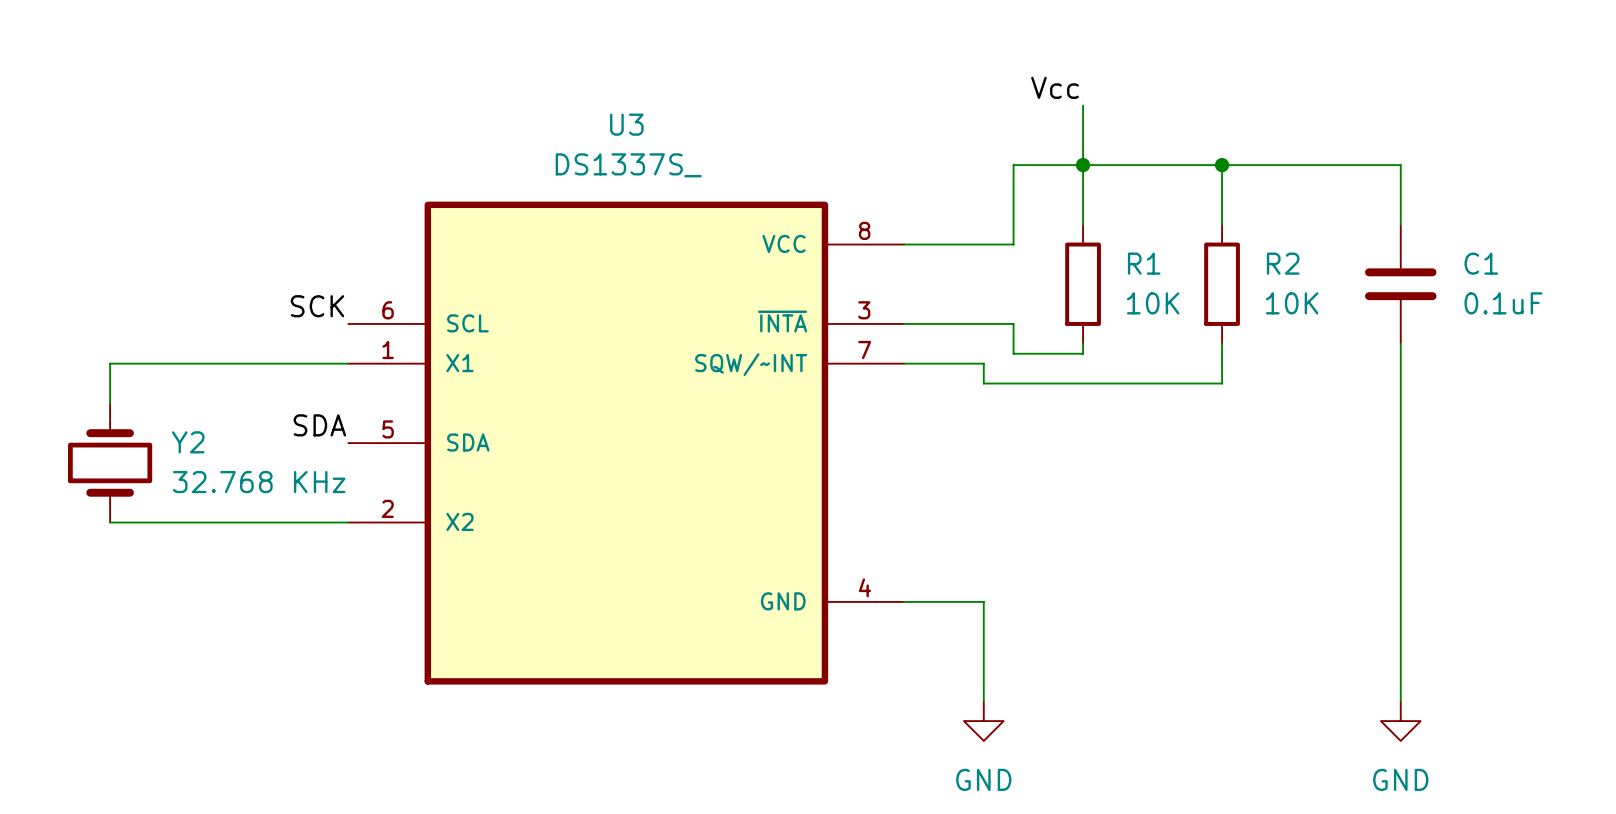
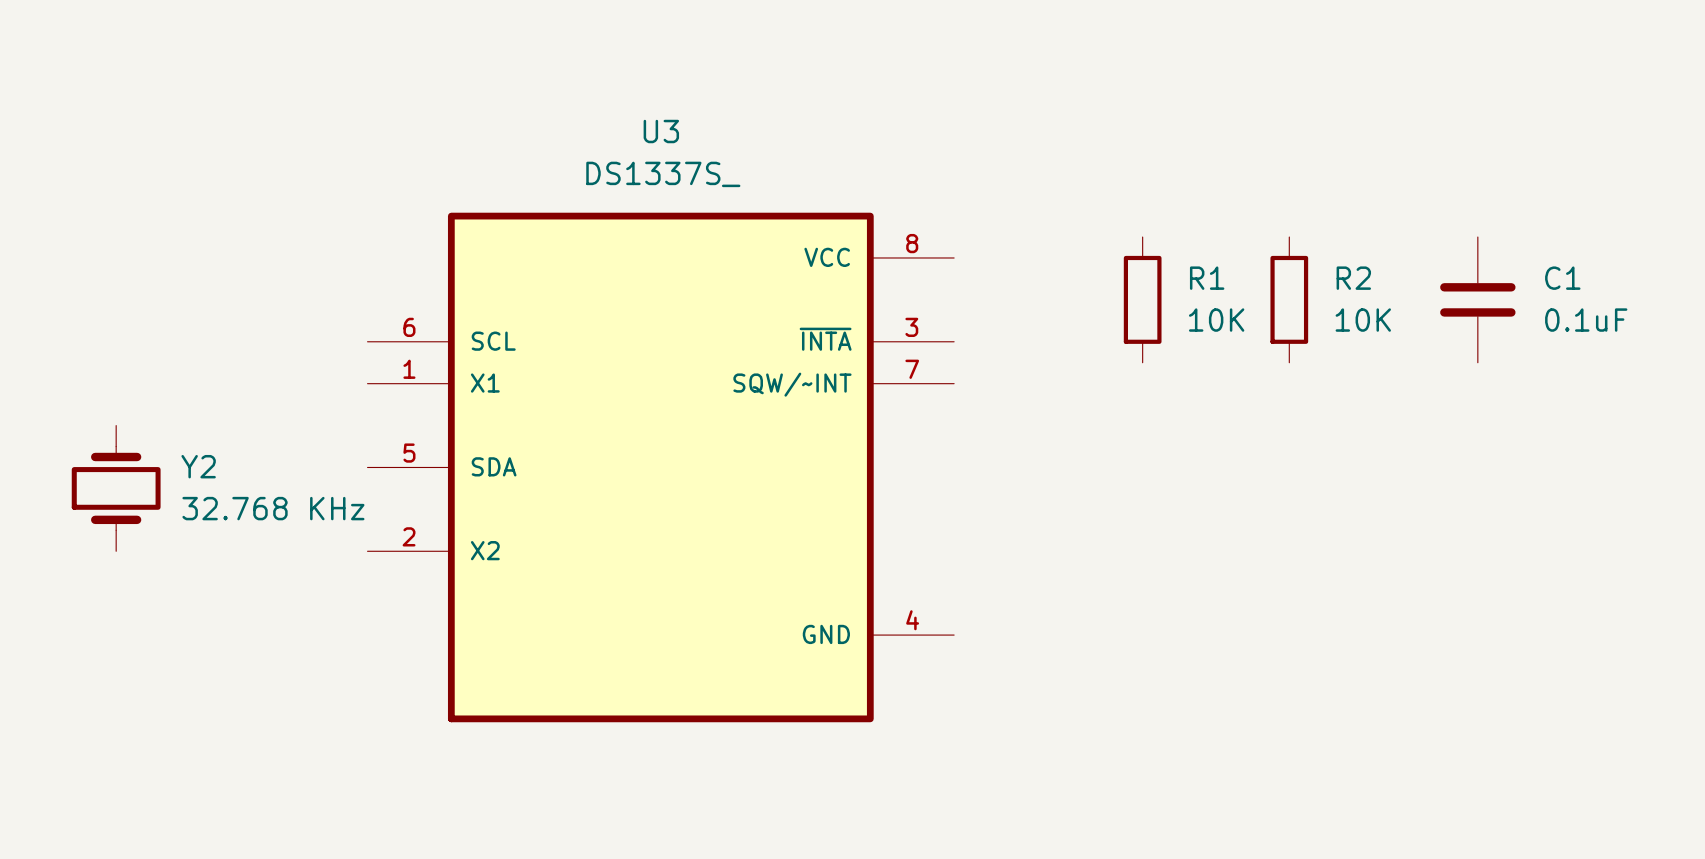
label: Vcc (1055, 87) -> none
wire: (1083, 105) (1083, 224) -> none
junction: (1083, 165) -> none
wire: (1222, 165) (1222, 224) -> none
junction: (1222, 165) -> none
wire: (1400, 224) (1400, 165) (1013, 165) (1013, 244) (904, 244) -> none
label: SCK (317, 306) -> none
wire: (904, 323) (1013, 323) (1013, 353) (1083, 353) (1083, 343) -> none
wire: (1222, 343) (1222, 383) (983, 383) (983, 363) (904, 363) -> none
wire: (1400, 343) (1400, 701) -> none
wire: (348, 363) (110, 363) (110, 403) -> none
label: SDA (319, 425) -> none
wire: (110, 522) (348, 522) -> none
wire: (904, 601) (983, 601) (983, 701) -> none
power symbol: GND (983, 721) -> none
power symbol: GND (1400, 721) -> none

